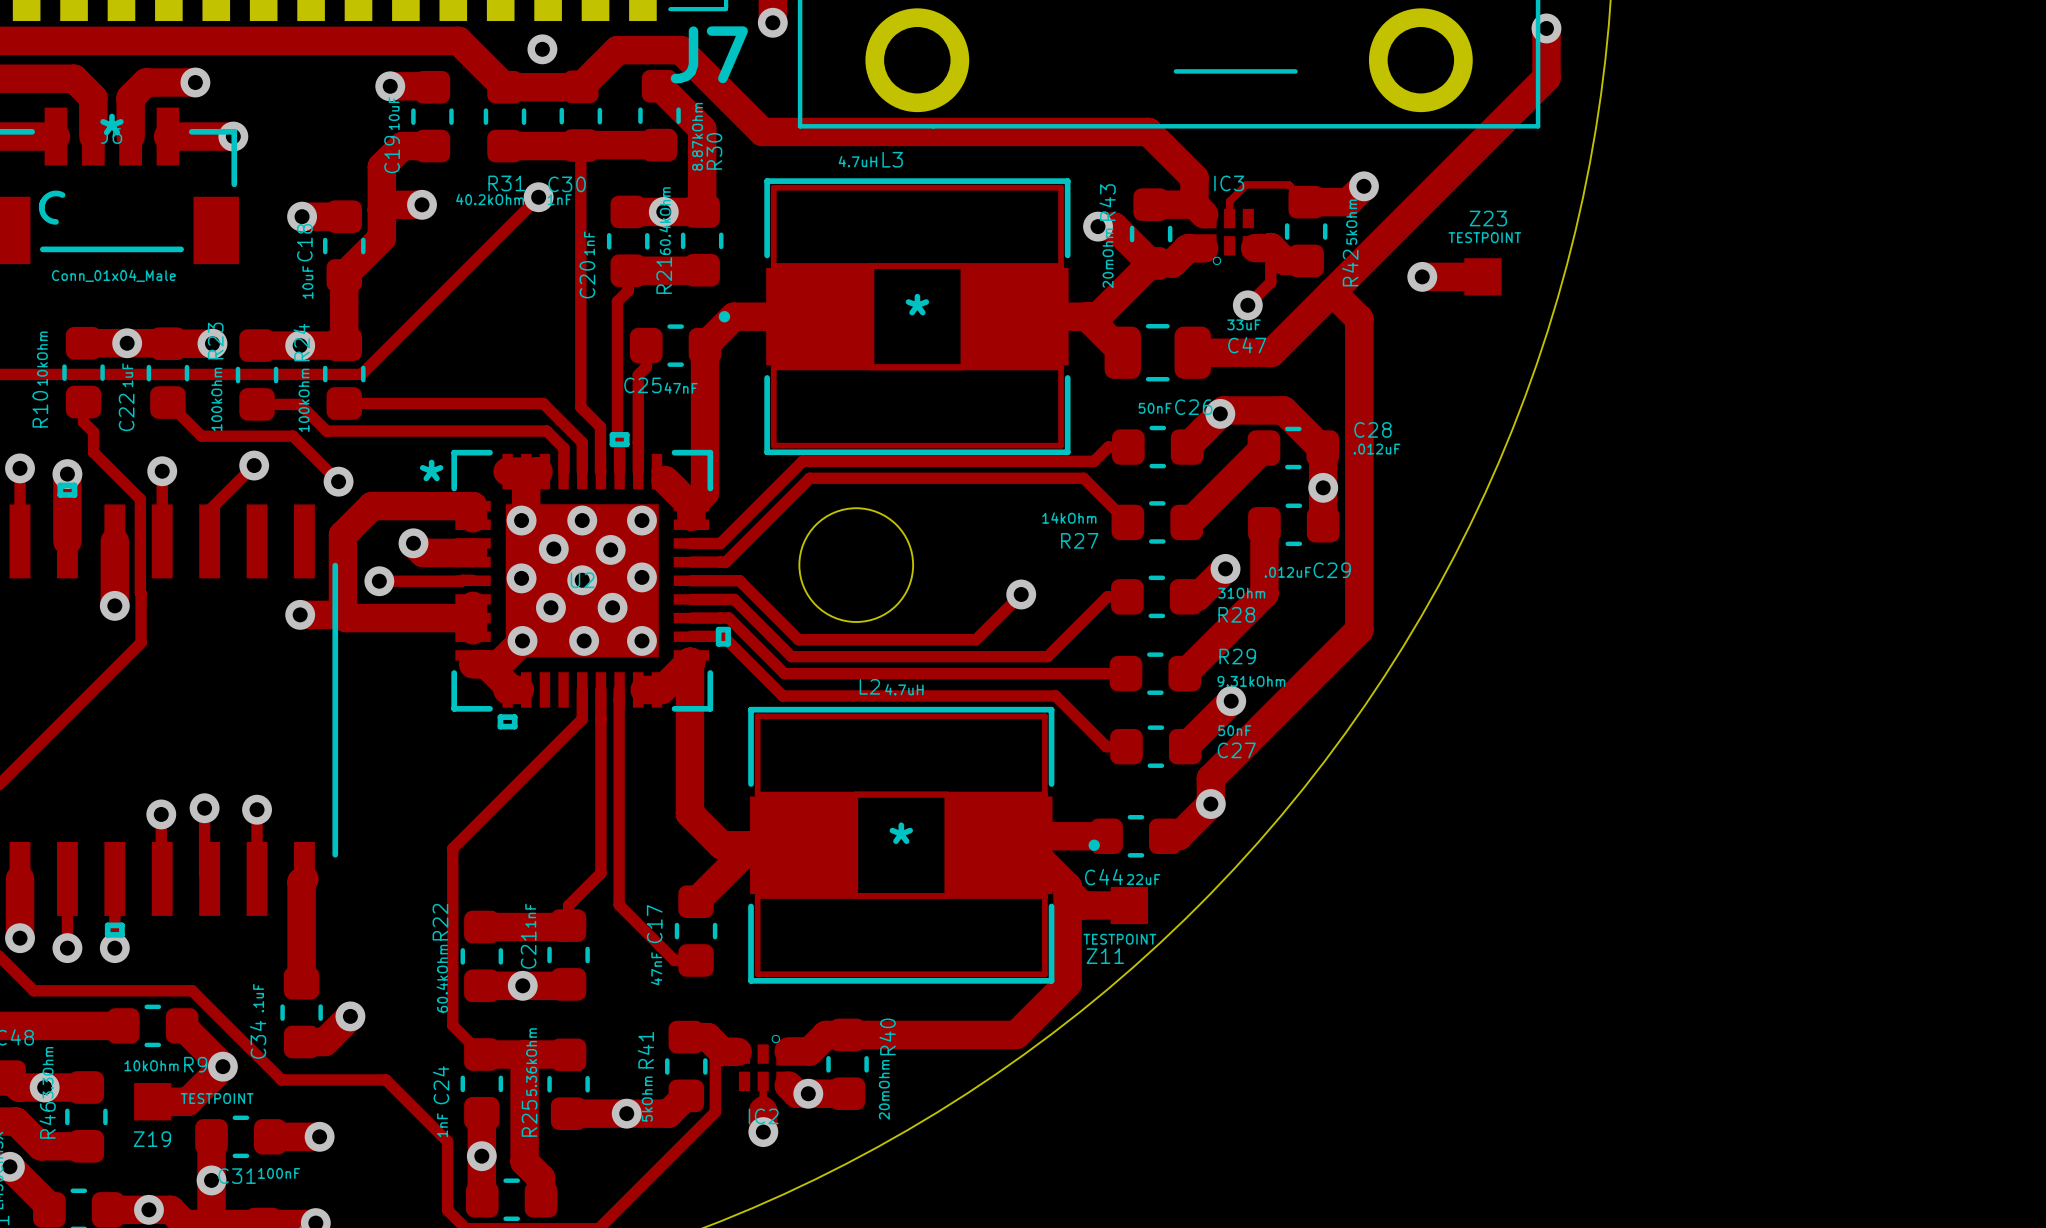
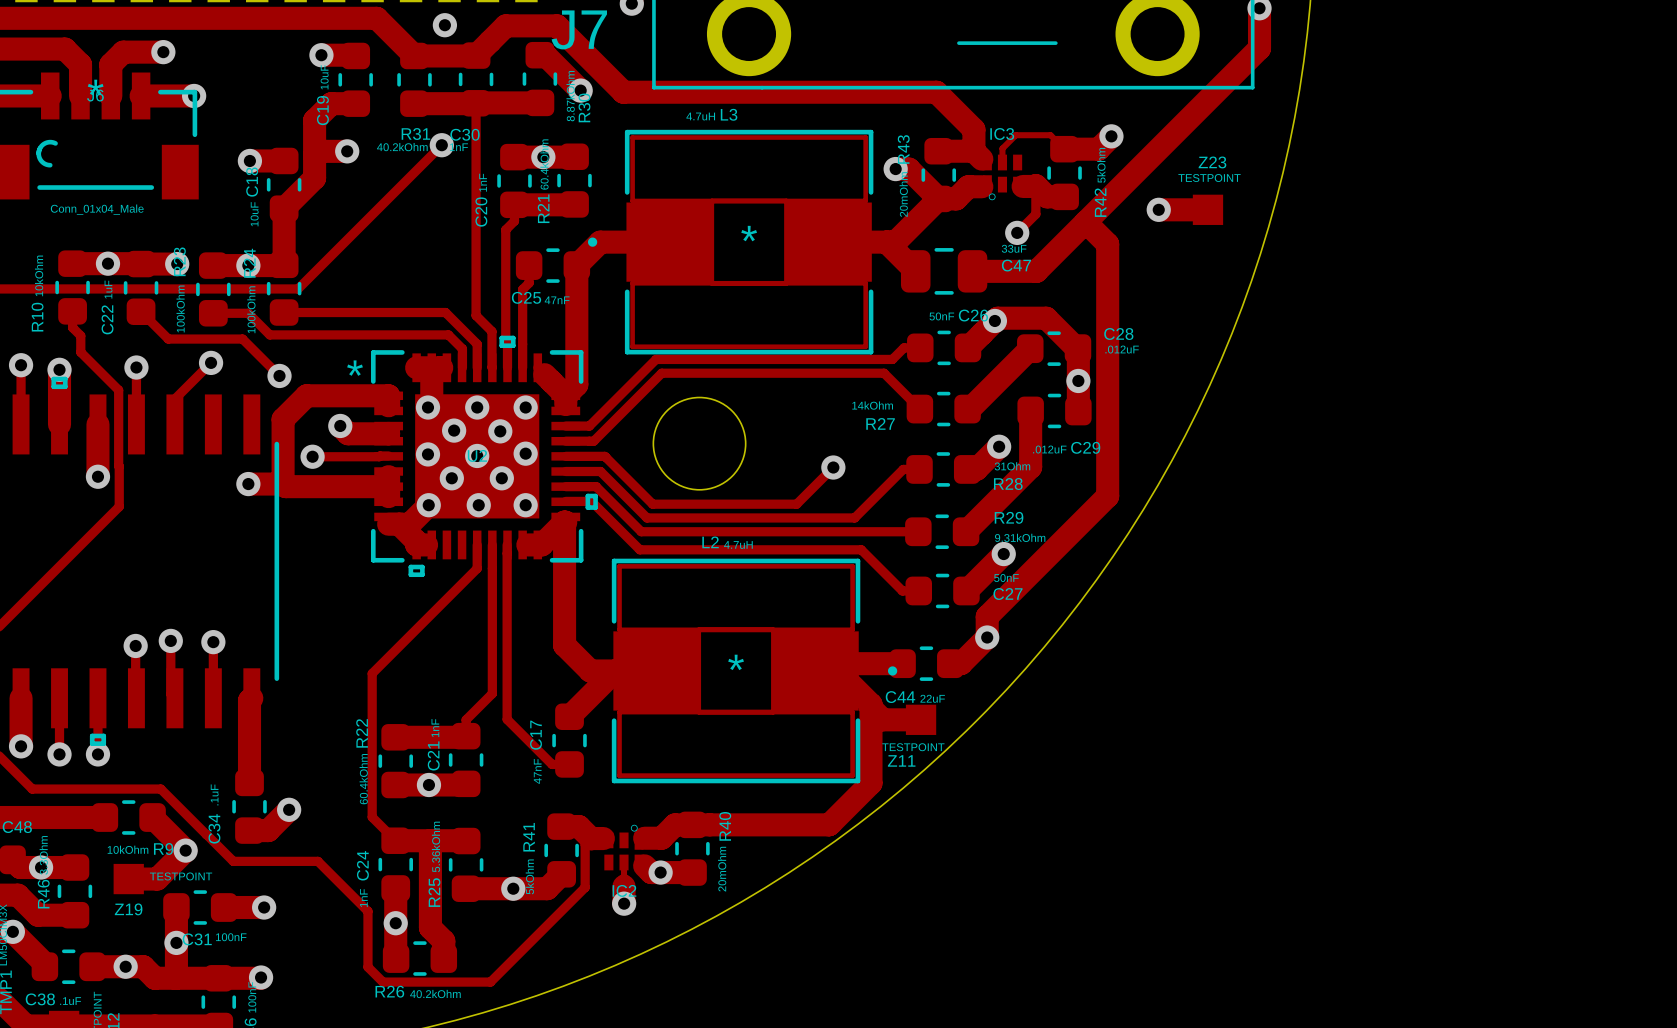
track: (659, 86) (702, 128) (702, 211) -> (539, 55) (545, 55) (580, 90)
via: none -> (580, 90)

